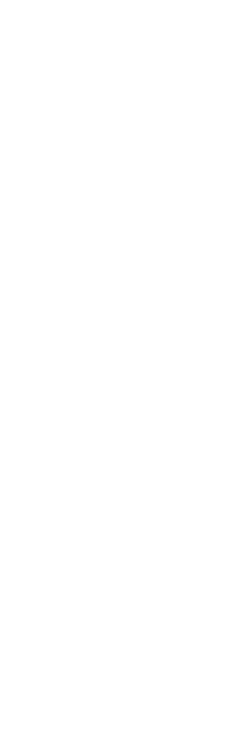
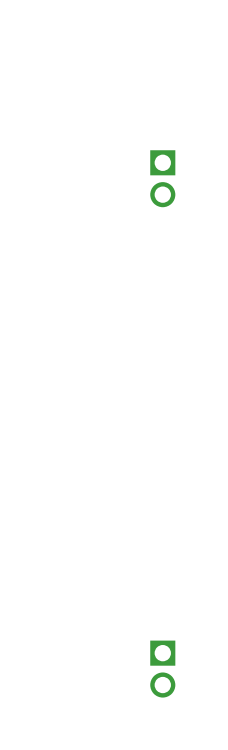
part: none -> (162, 178)
part: none -> (162, 669)

